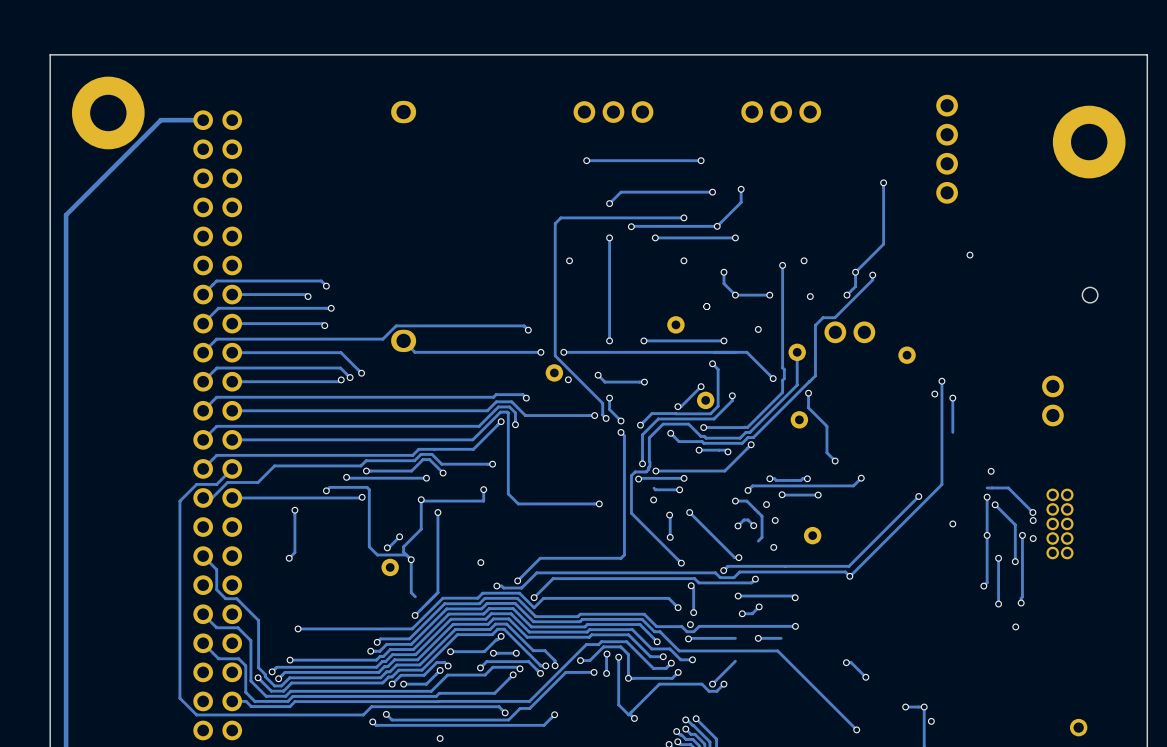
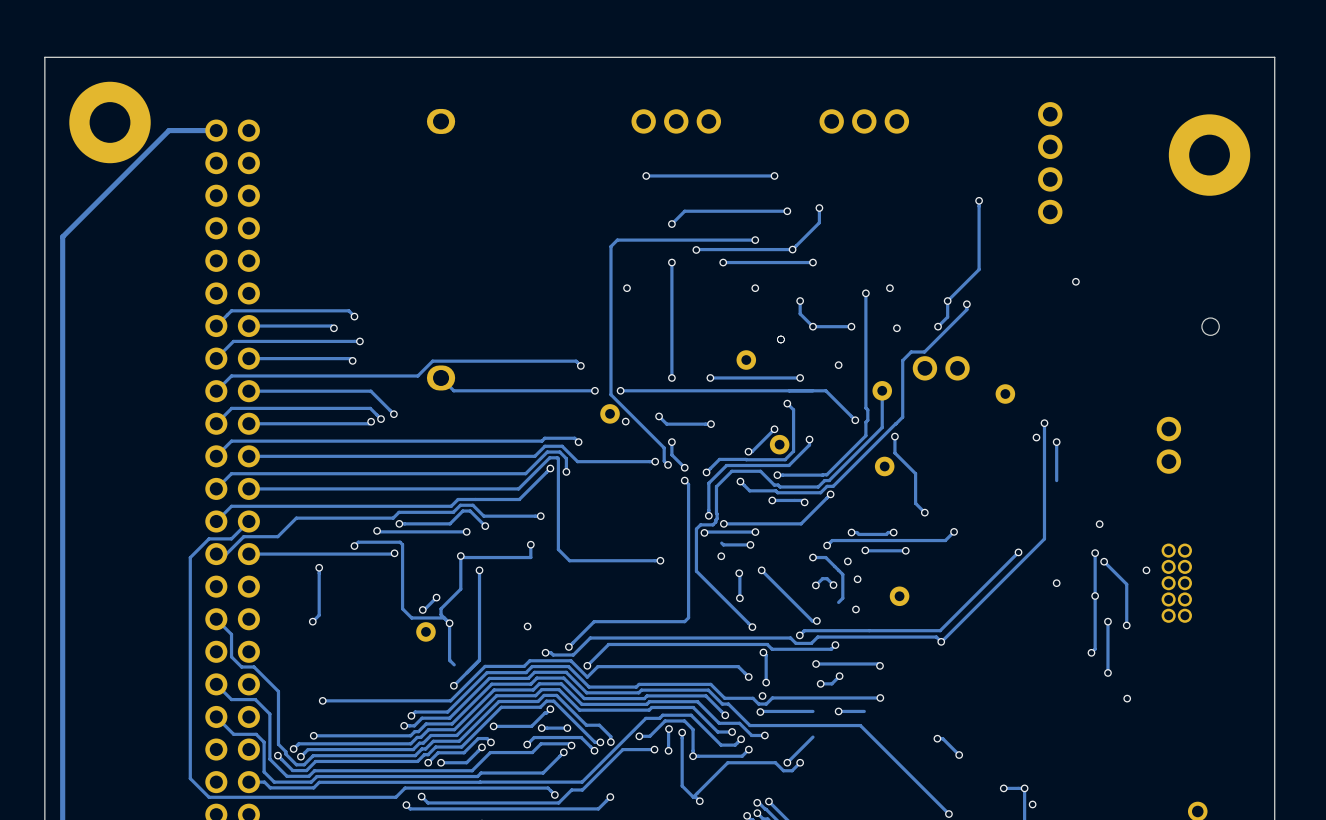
track: (987, 487) (1008, 487) (1032, 512) -> none
via: (1033, 520) -> none
track: (1022, 535) (1021, 603) -> none
via: (1022, 535) -> none
via: (1033, 538) -> none
via: (1021, 603) -> none

